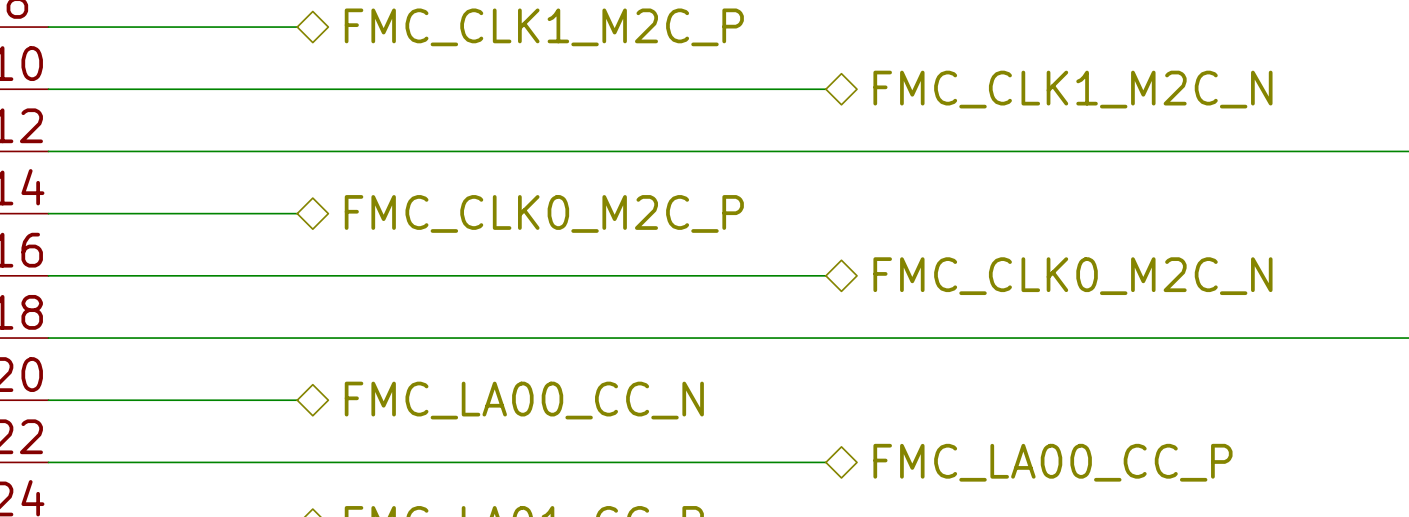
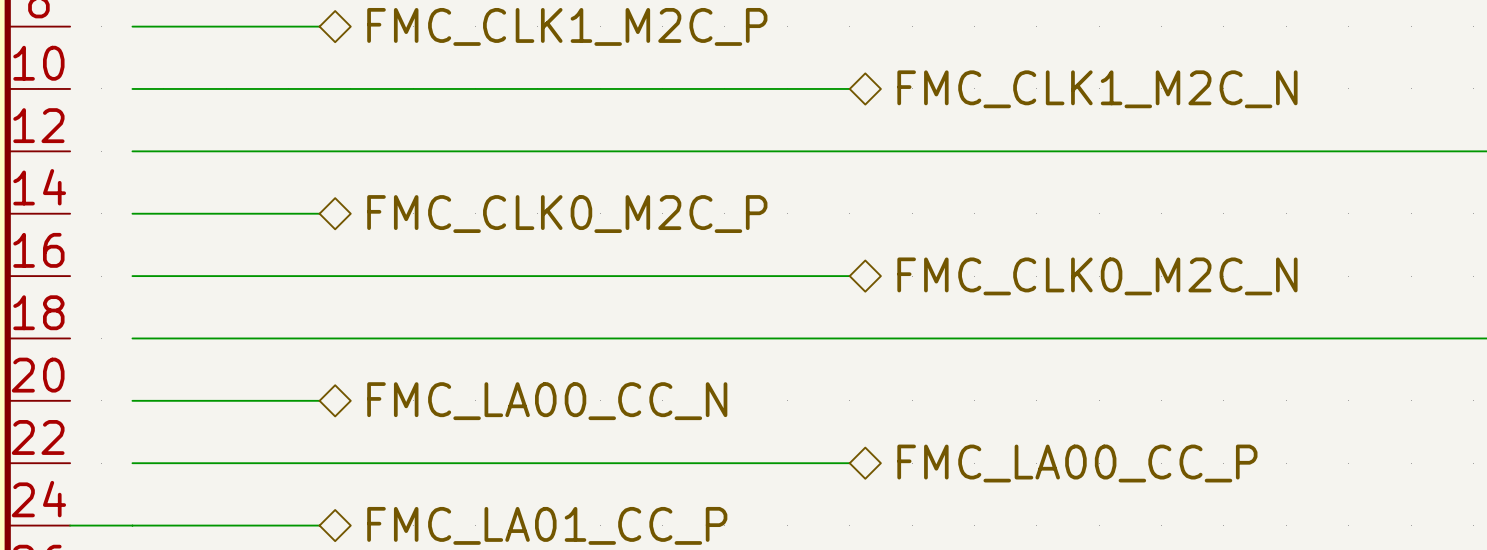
wire: (48, 27) (110, 27) -> none
wire: (48, 89) (110, 89) -> none
wire: (48, 151) (110, 151) -> none
wire: (48, 213) (110, 213) -> none
wire: (48, 275) (110, 275) -> none
wire: (48, 338) (110, 338) -> none
wire: (48, 400) (110, 400) -> none
wire: (48, 462) (110, 462) -> none

